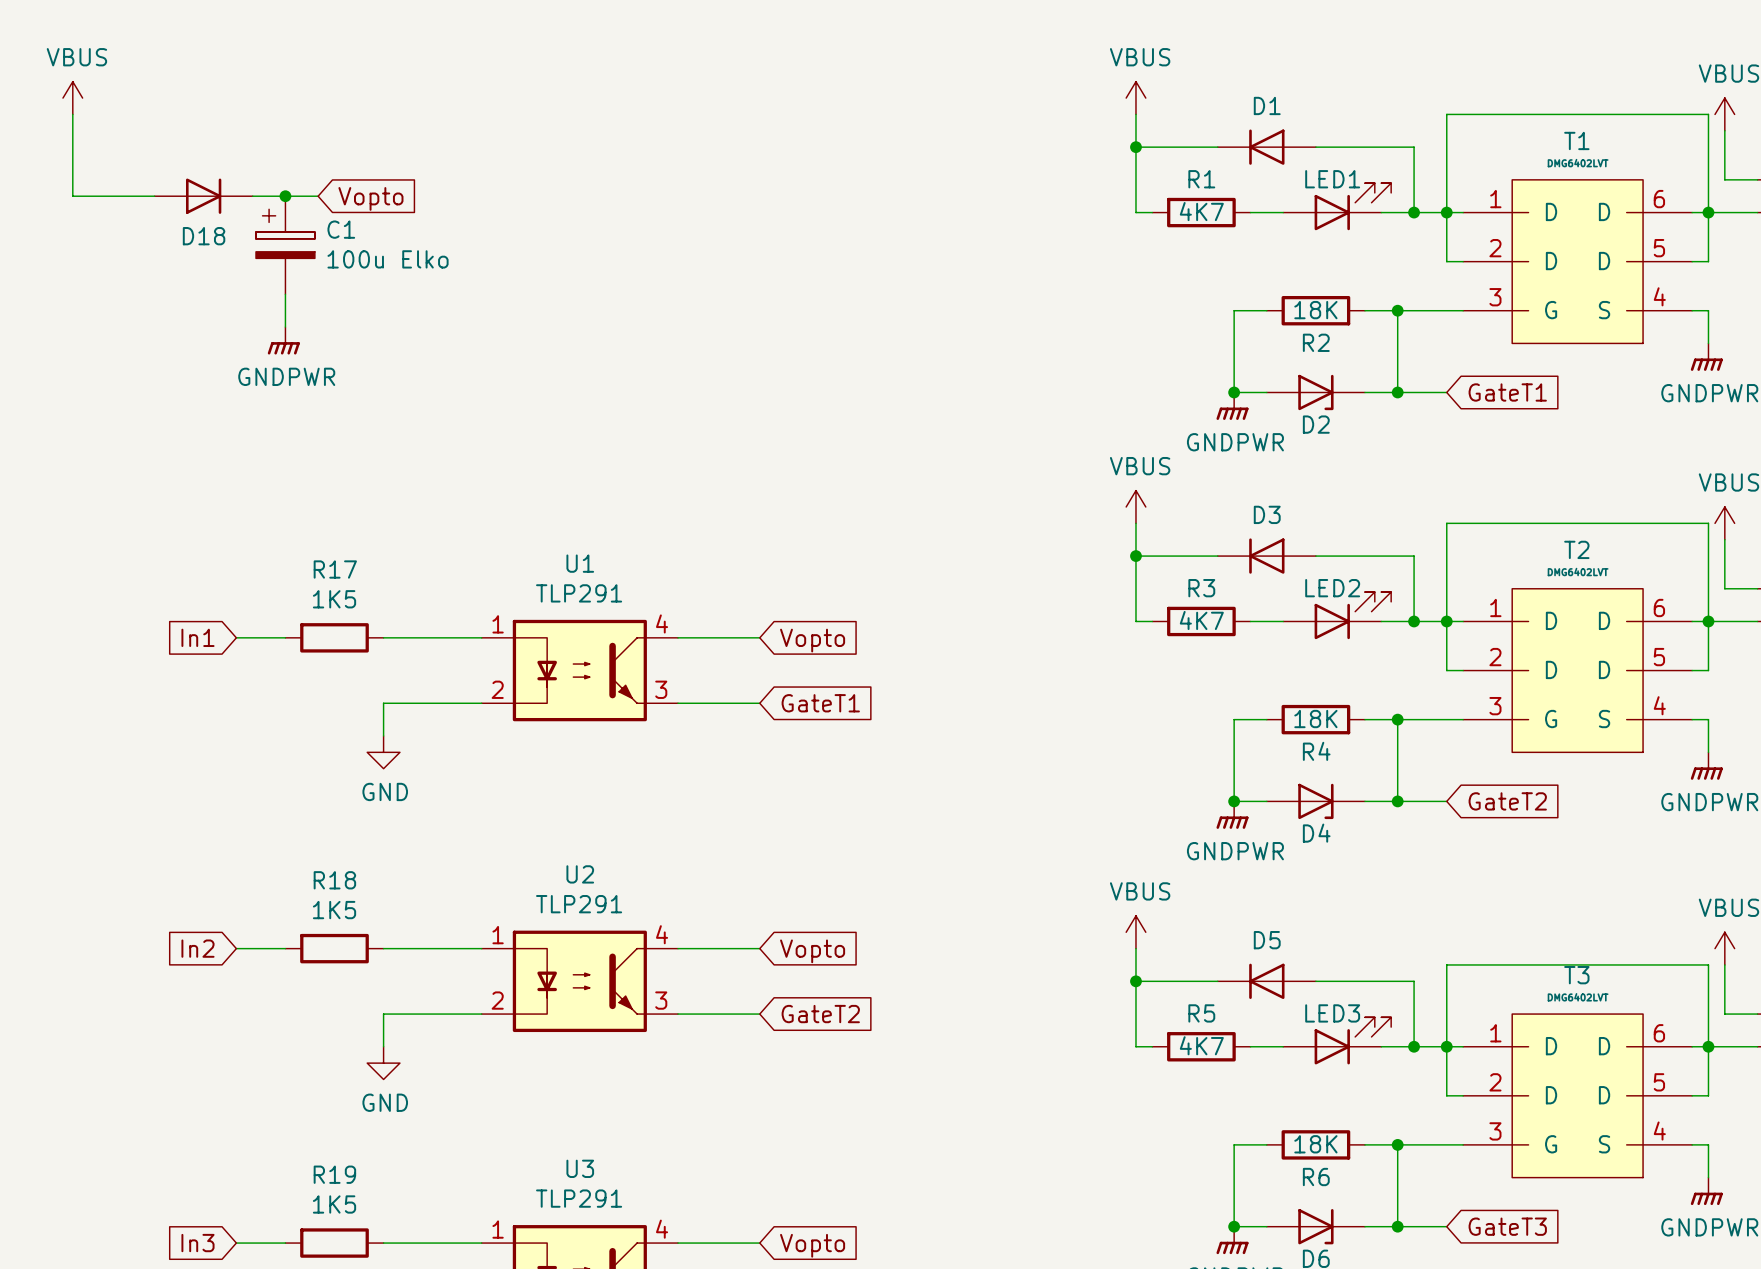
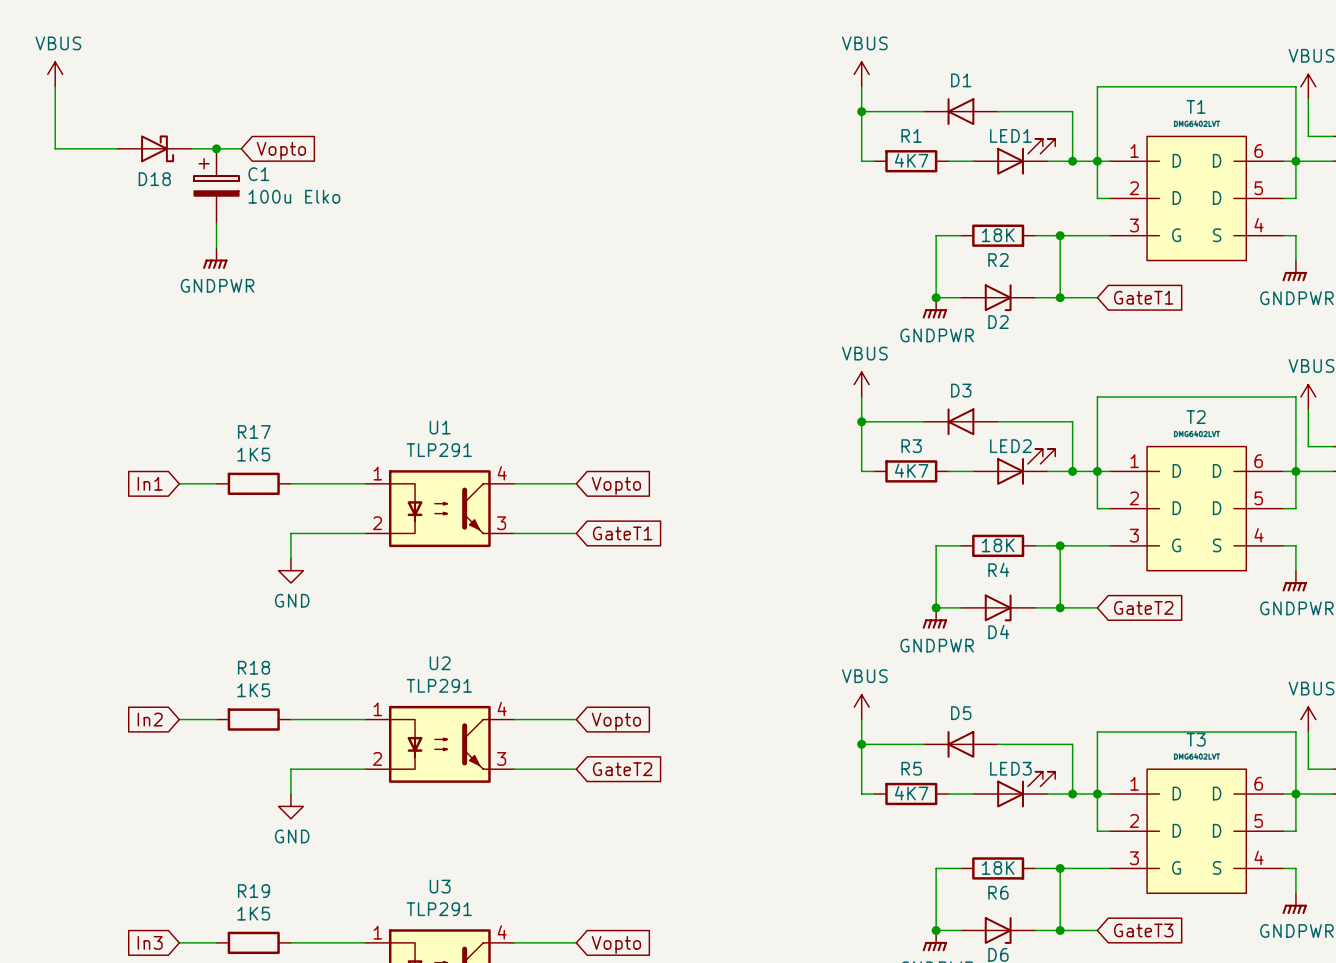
D18 symbol: [154, 178, 253, 214] -> [117, 135, 192, 163]

